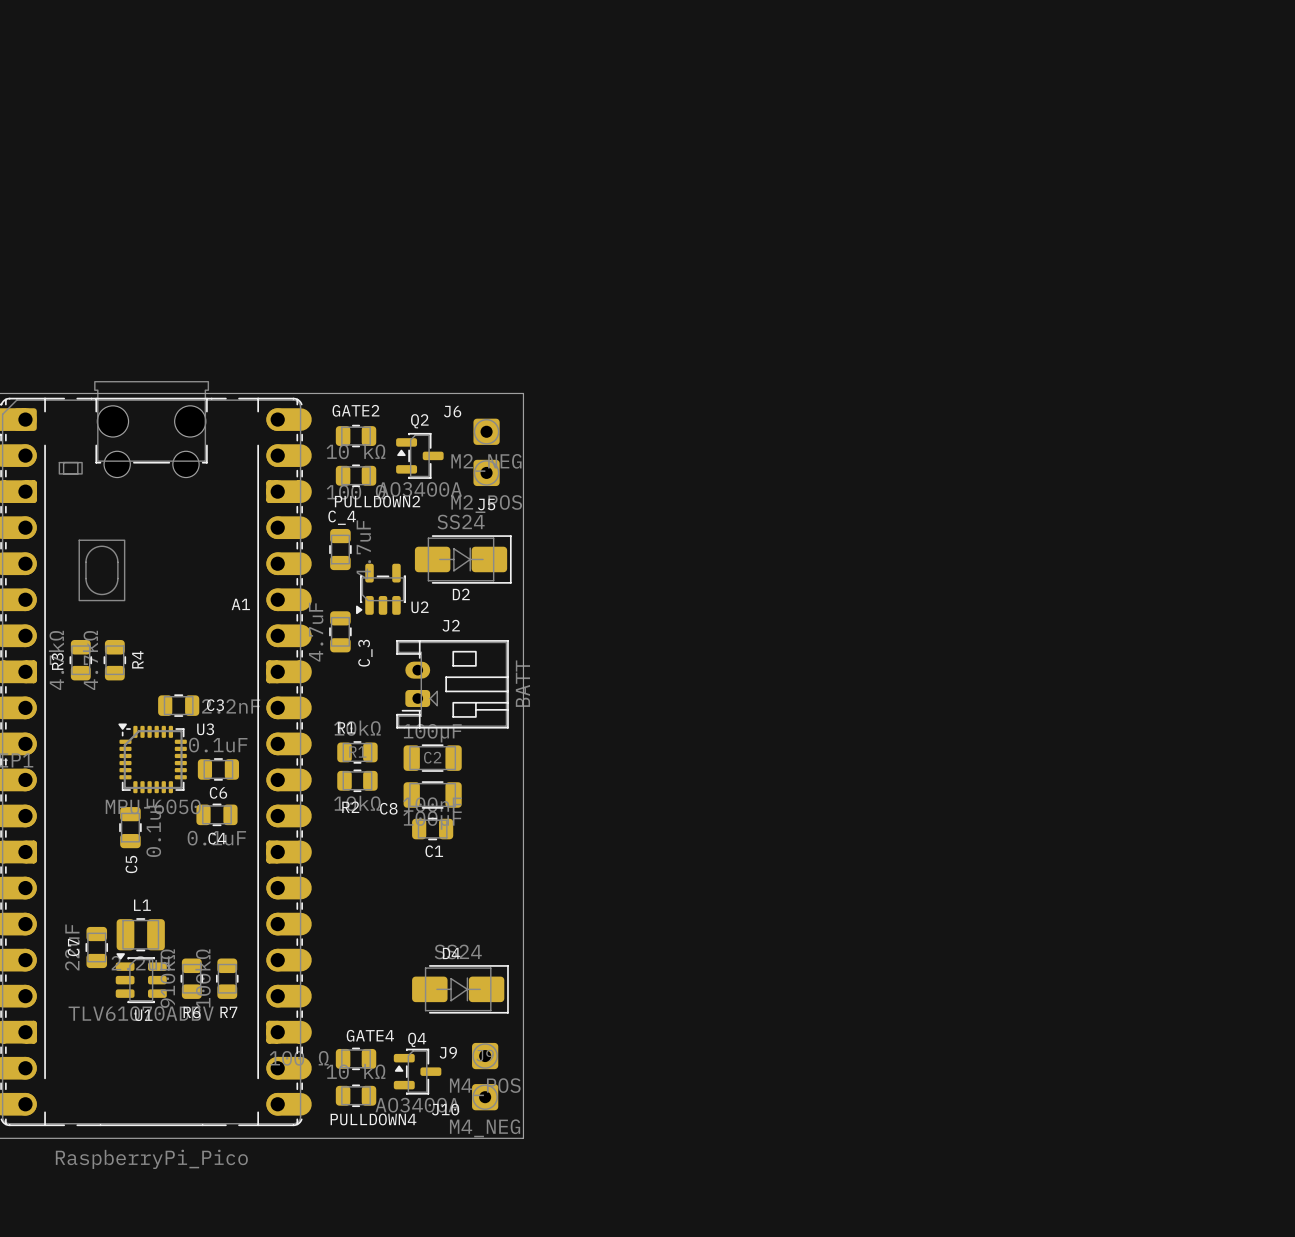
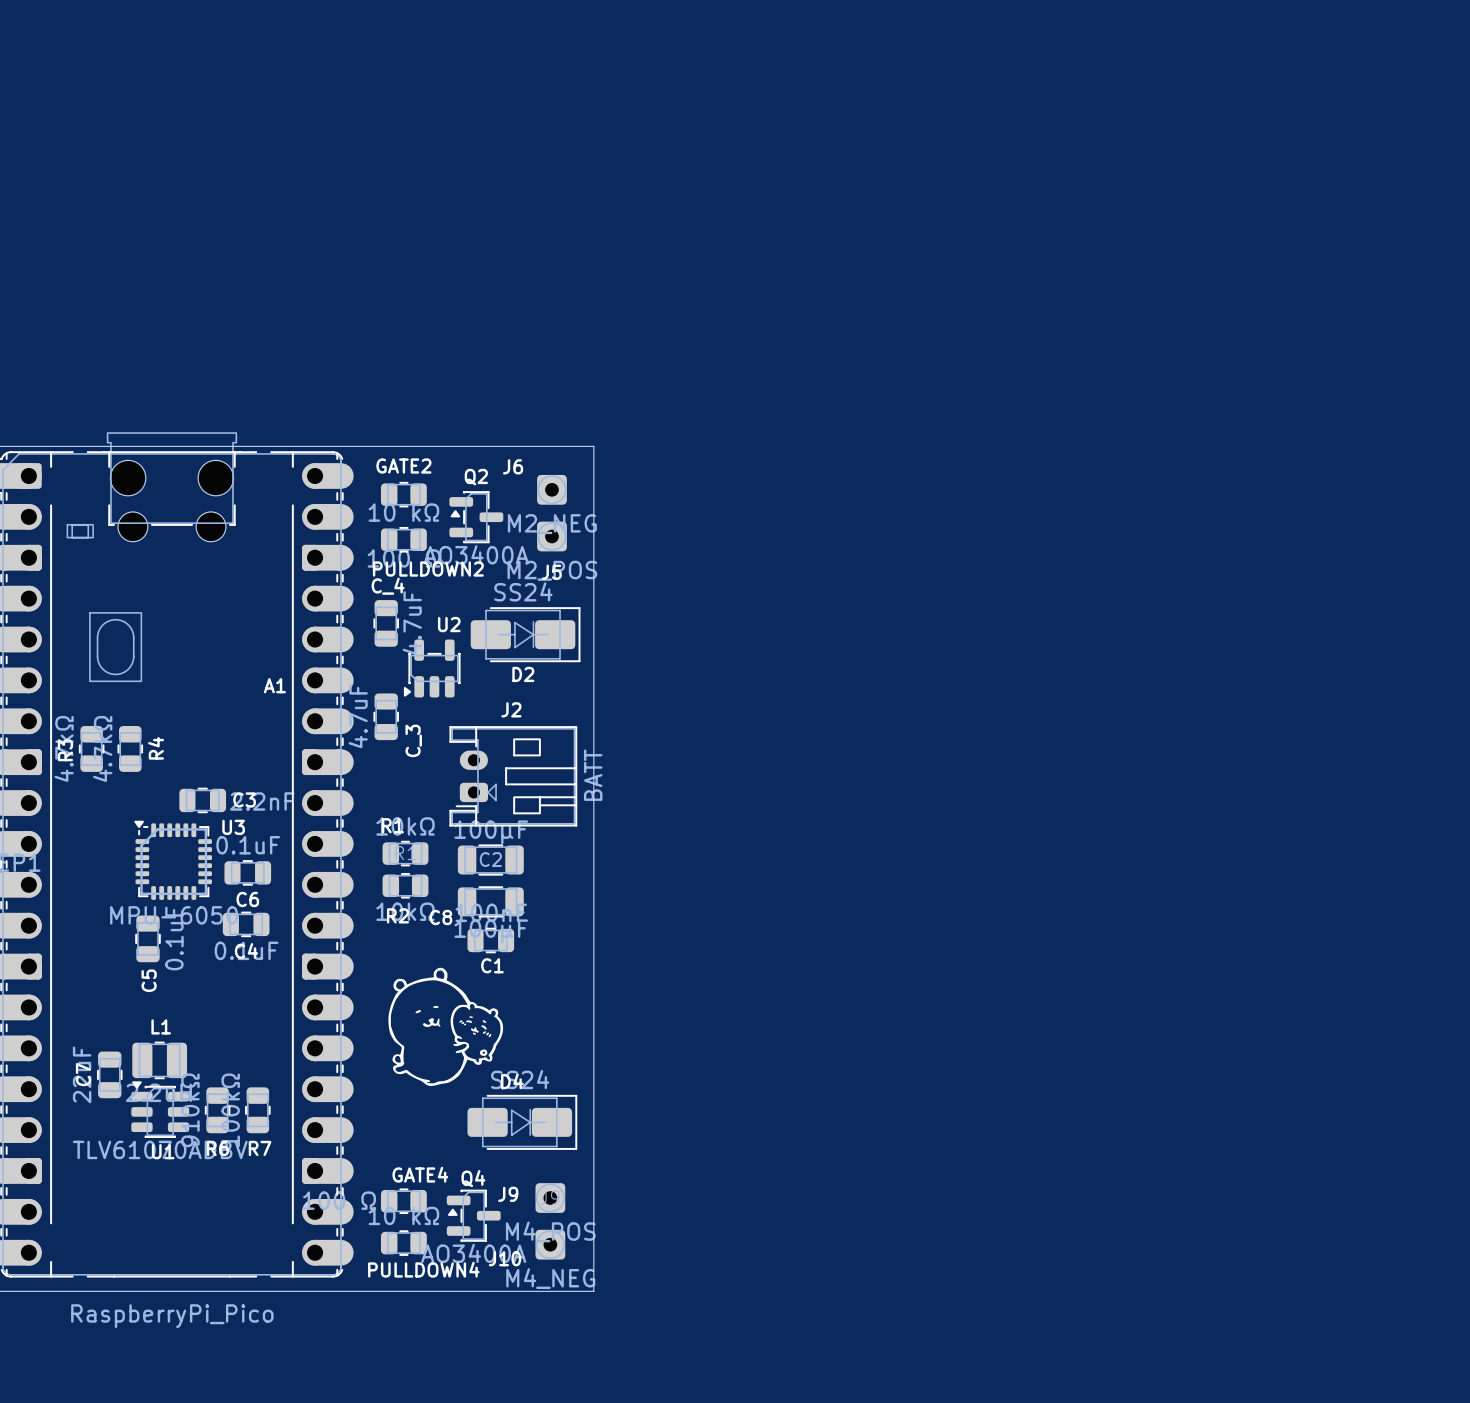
U2 name position: U2 (420, 607) -> U2 (449, 624)
drawing: none -> [388, 967, 504, 1086]

